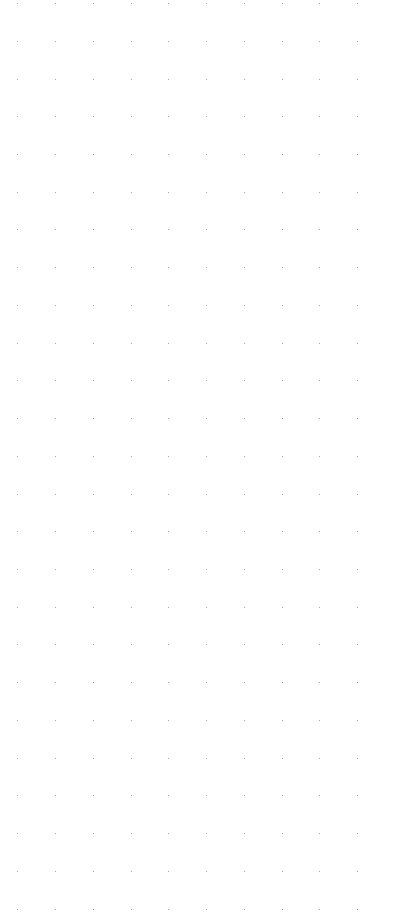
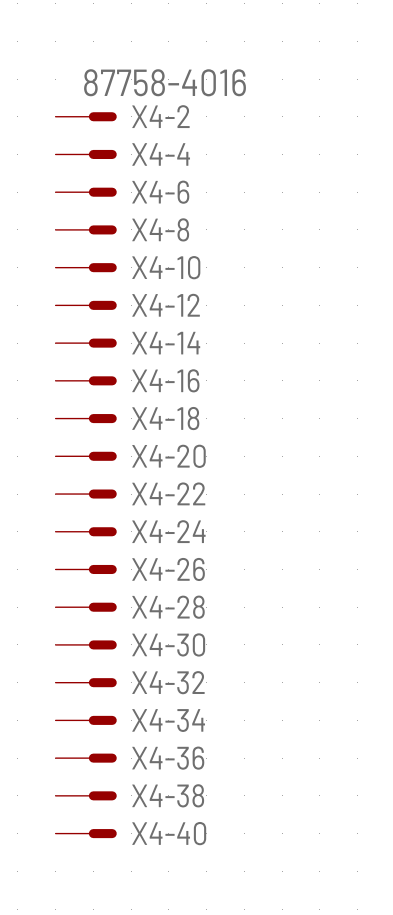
X4-2: none -> 87758-4016 (86, 116)
X4-4: none -> (86, 154)
X4-6: none -> (86, 192)
X4-8: none -> (86, 229)
X4-10: none -> (86, 267)
X4-12: none -> (86, 305)
X4-14: none -> (86, 343)
X4-16: none -> (86, 380)
X4-18: none -> (86, 418)
X4-20: none -> (86, 456)
X4-22: none -> (86, 494)
X4-24: none -> (86, 531)
X4-26: none -> (86, 569)
X4-28: none -> (86, 607)
X4-30: none -> (86, 644)
X4-32: none -> (86, 682)
X4-34: none -> (86, 720)
X4-36: none -> (86, 758)
X4-38: none -> (86, 795)
X4-40: none -> (86, 833)

